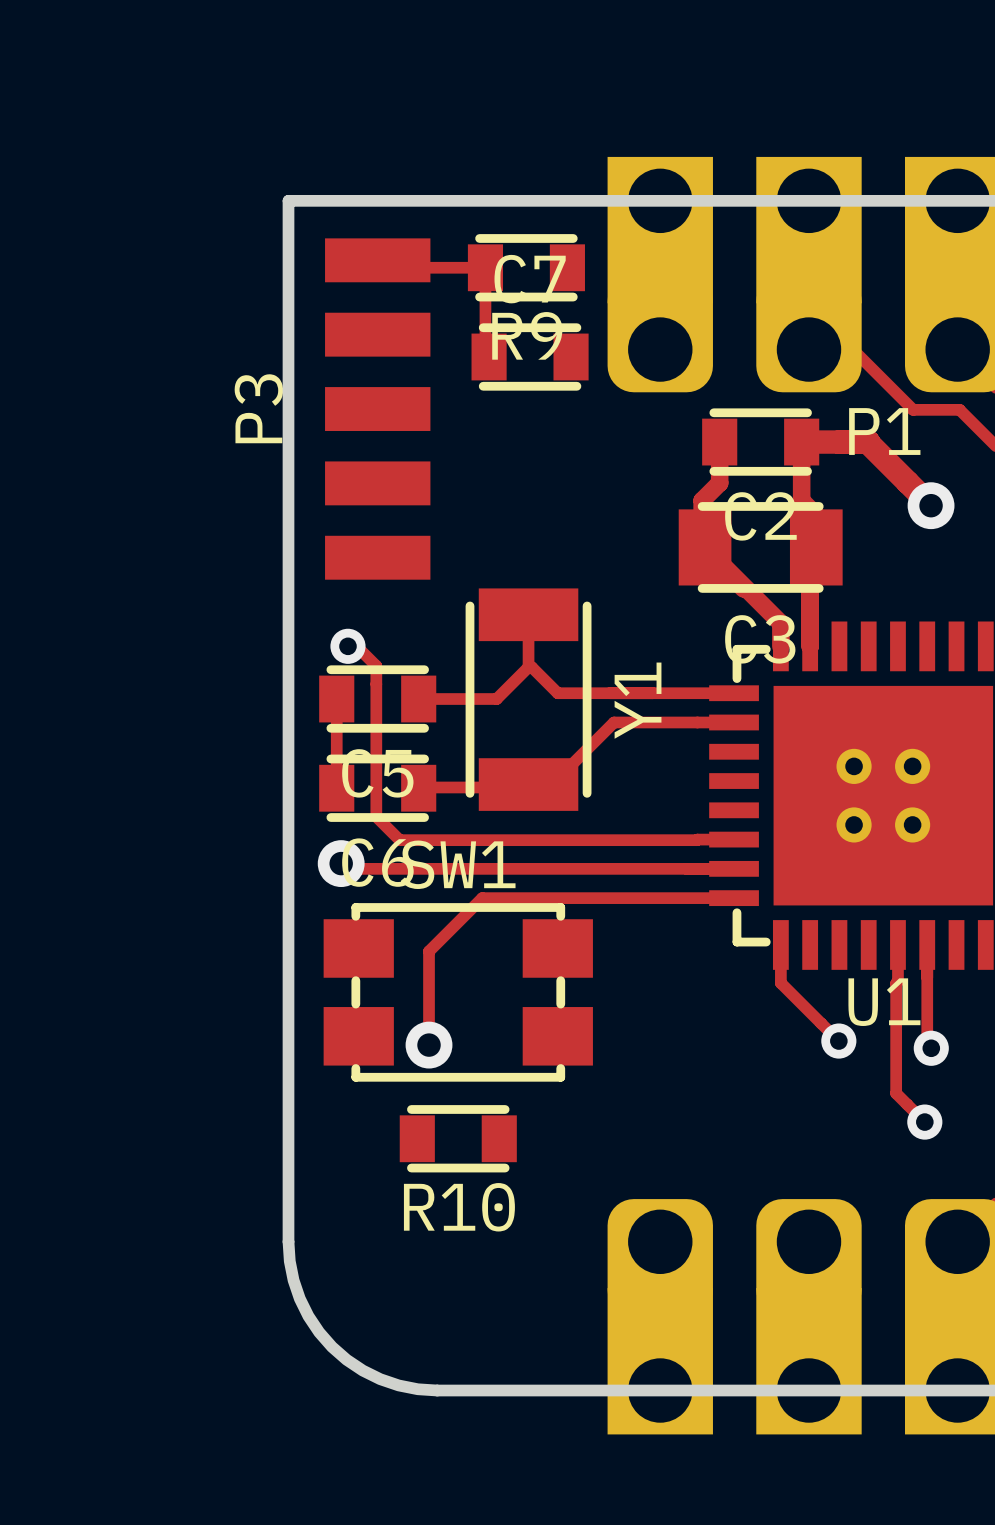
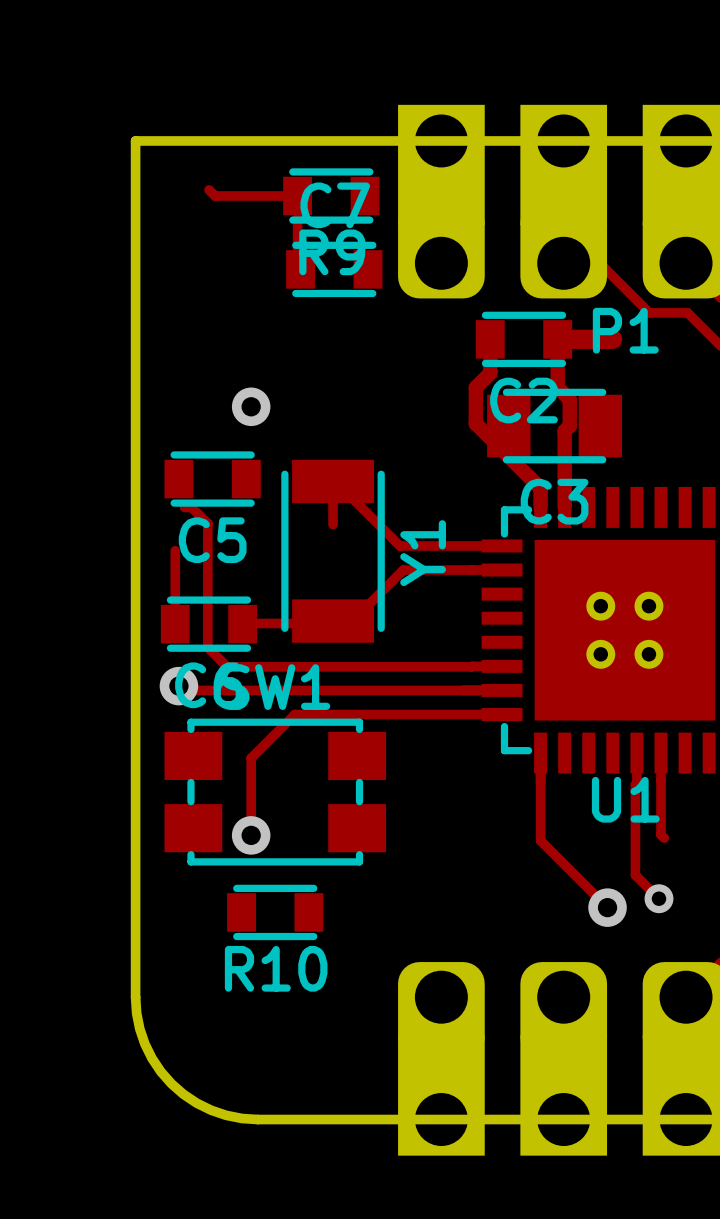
P3: (377, 409) -> none
track: (868, 443) (931, 505) (935, 501) -> none
via: (931, 505) -> none
via: none -> (251, 406)
C3 position: (760, 547) -> (554, 426)
via: (347, 646) -> none
track: (609, 693) (557, 693) (531, 667) (528, 667) (496, 699) (418, 699) -> (399, 545) (335, 481)
C5 position: (377, 699) -> (212, 479)
track: (780, 983) (838, 1041) -> (540, 784) (540, 840) (607, 907)
via: (838, 1041) -> none
via: (931, 1048) -> none
via: none -> (607, 907)

